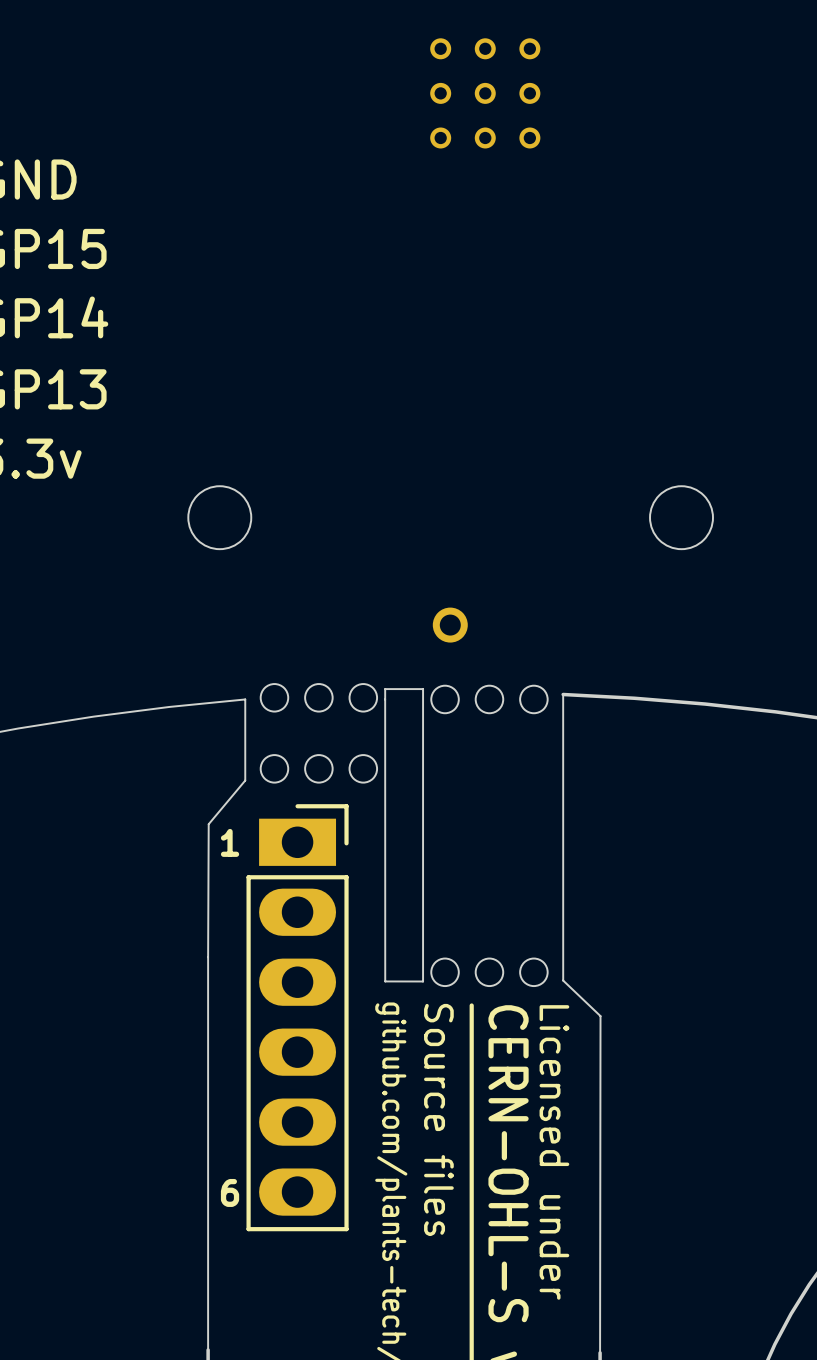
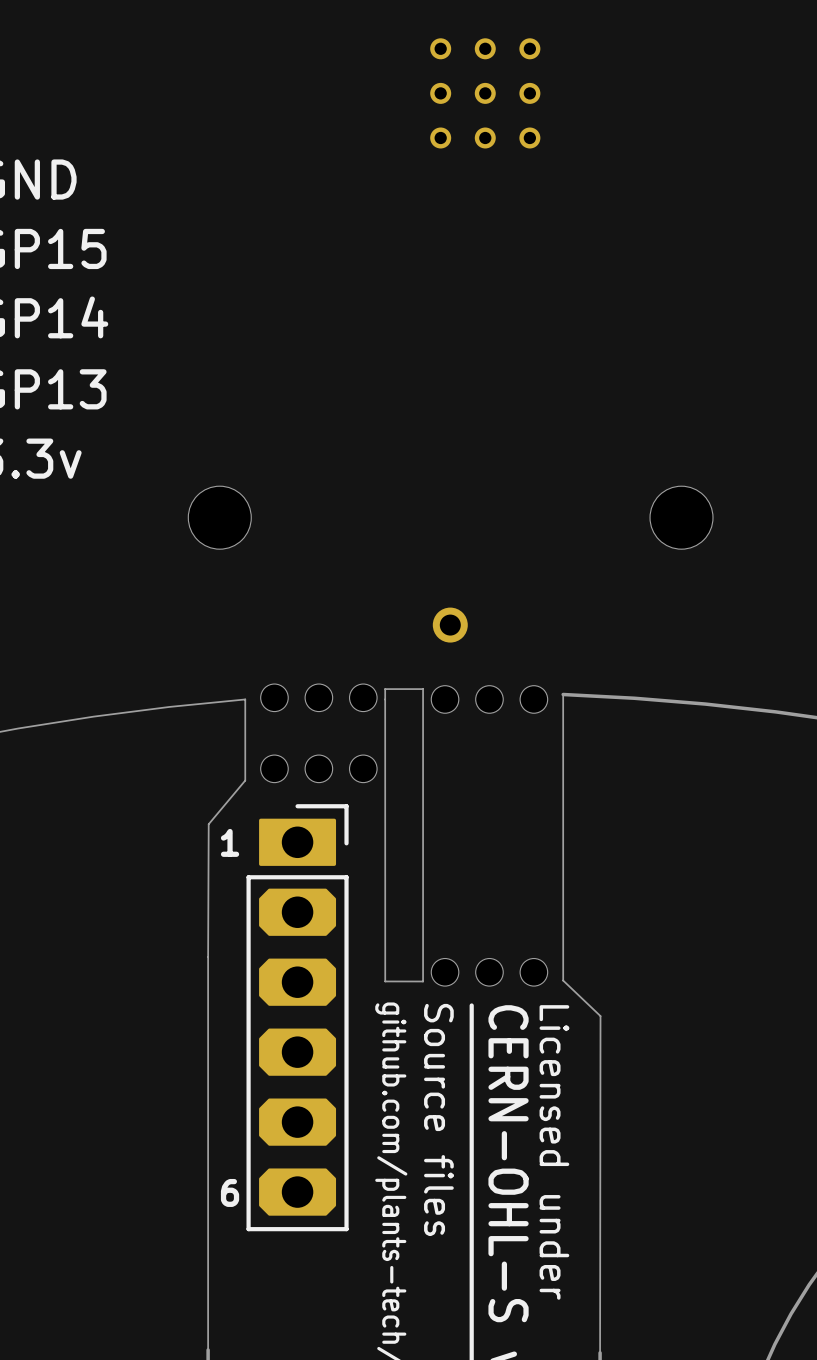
part footprint: [246, 804, 349, 1232] -> [246, 804, 349, 1232]

